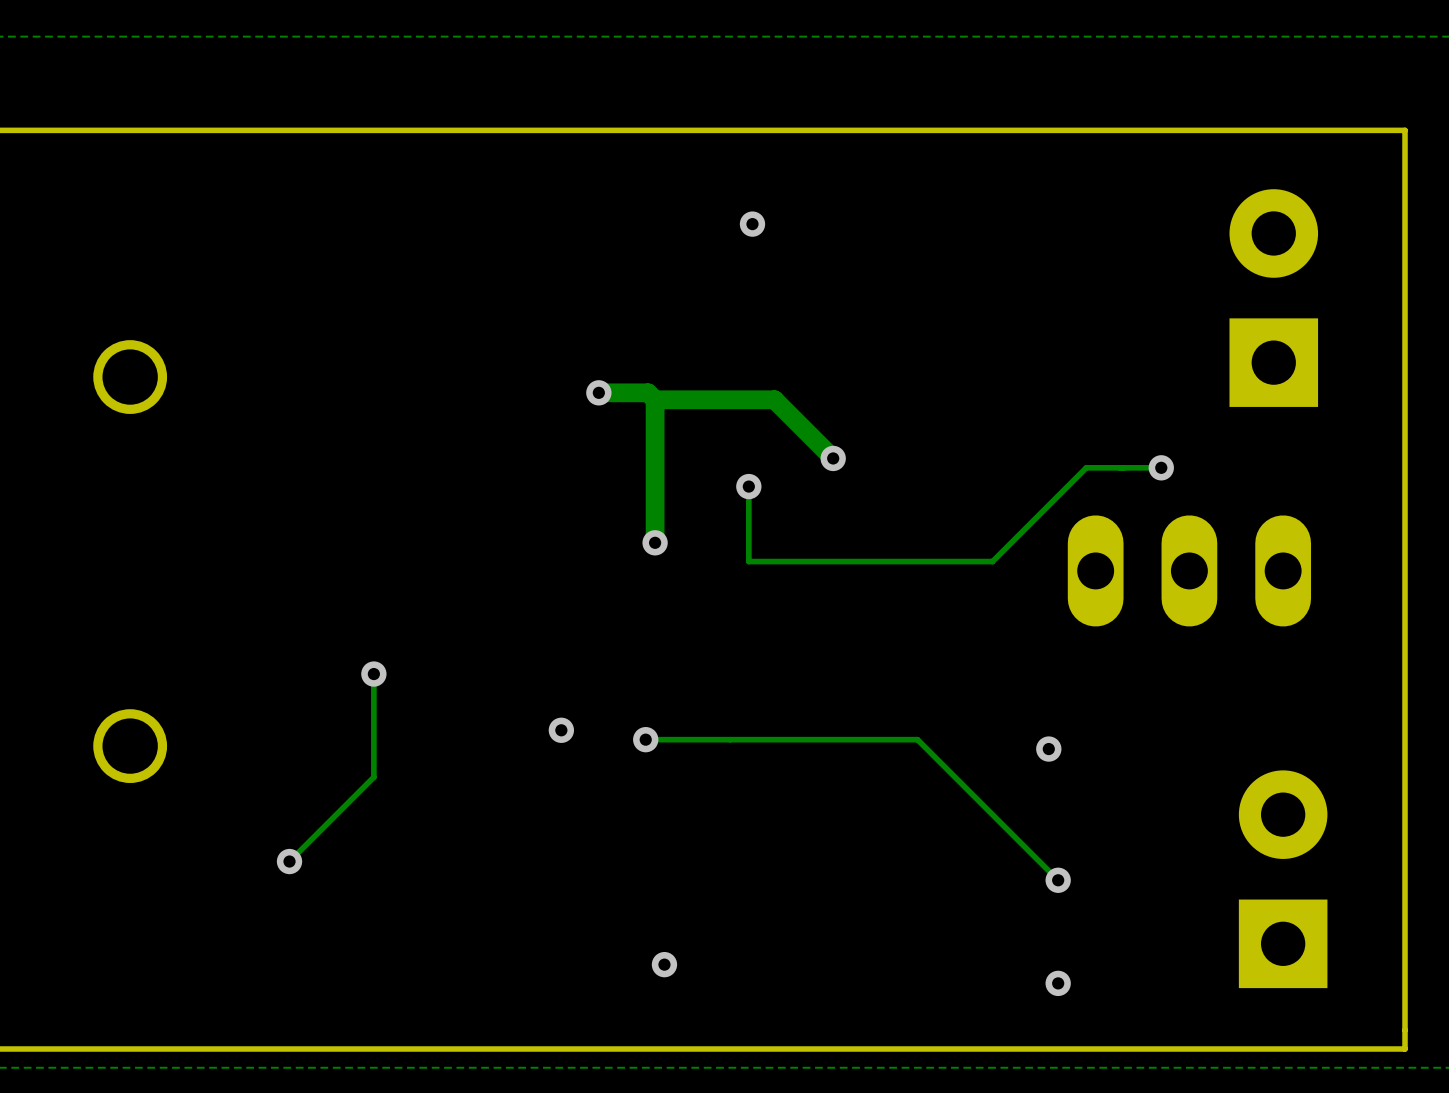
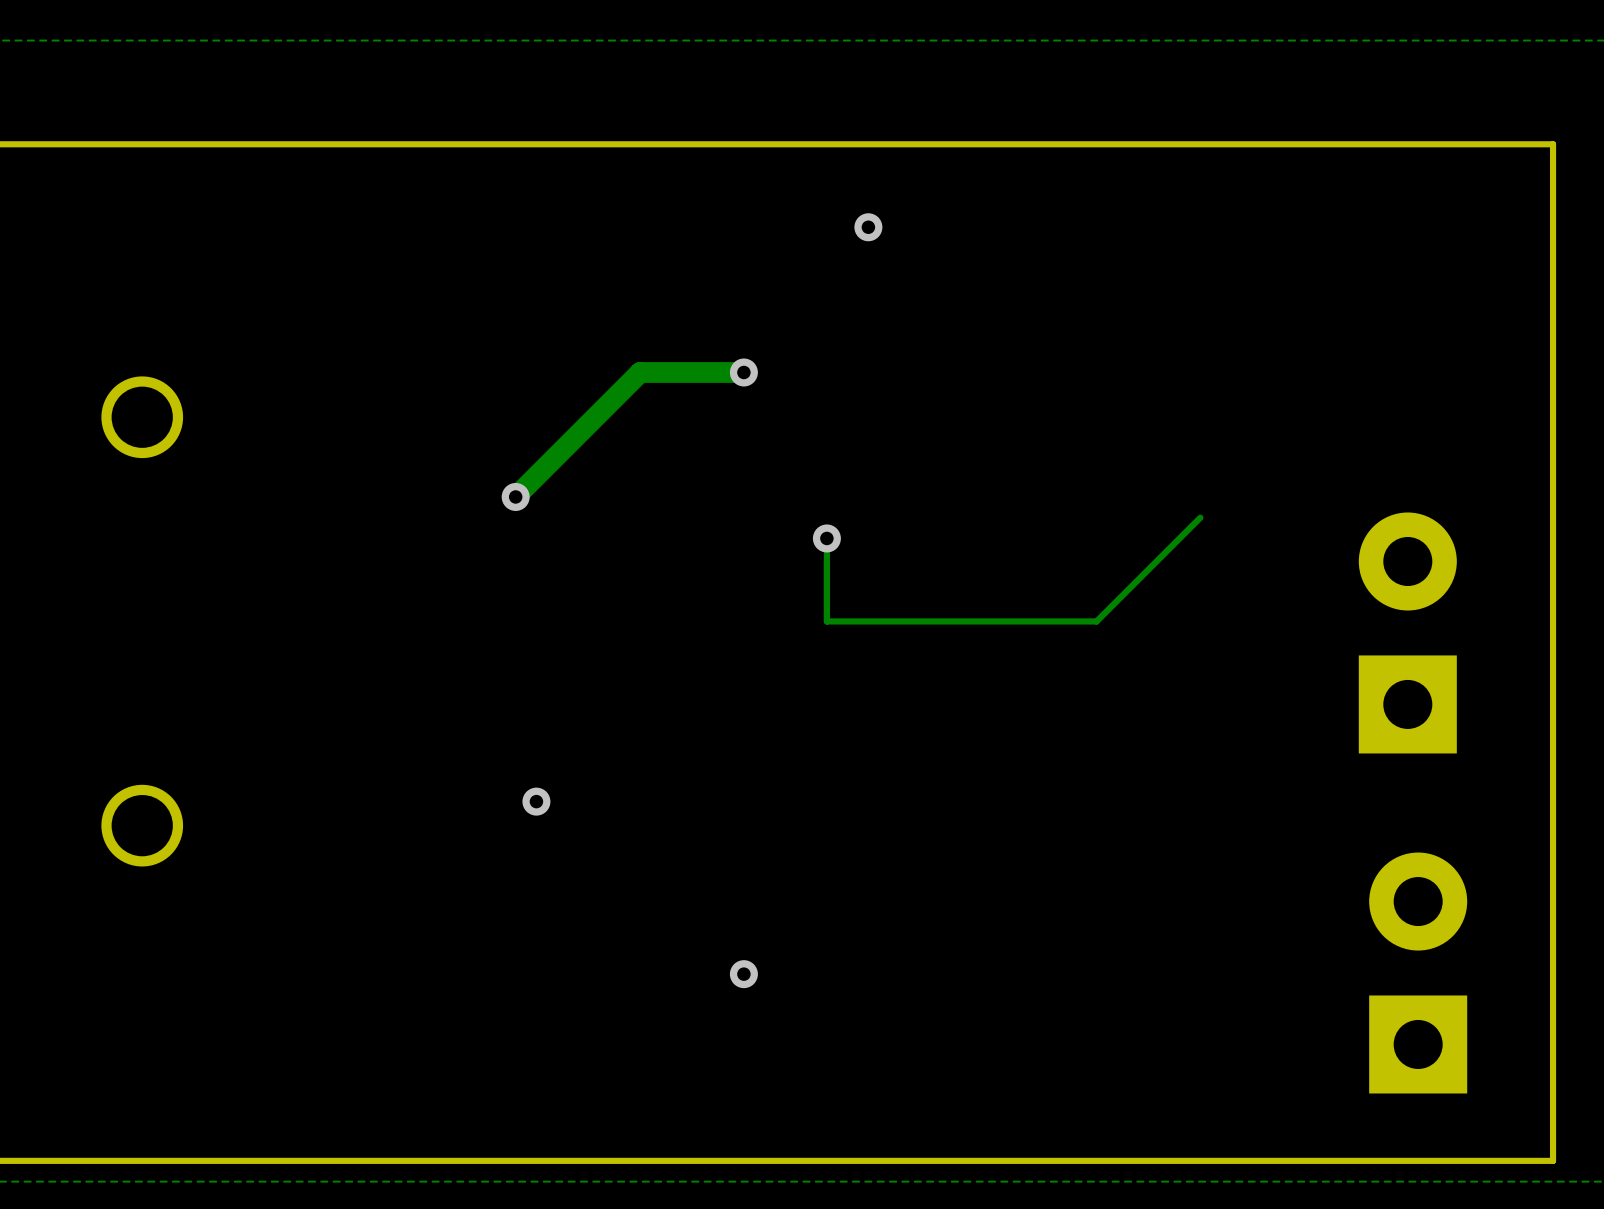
via position: (752, 224) -> (868, 227)
part position: (1273, 298) -> (1407, 632)
track: none -> (743, 372) (640, 372) (515, 496)
via: none -> (743, 372)
track: (598, 392) (648, 392) (655, 399) -> none
via: (598, 392) -> none
track: (655, 399) (774, 399) (833, 458) -> none
track: (655, 399) (655, 542) -> none
via: none -> (515, 496)
via: (833, 458) -> none
track: (1161, 467) (1086, 467) -> none
via: (1161, 467) -> none
via: (655, 542) -> none
part: (1189, 570) -> none
track: (373, 674) (373, 777) (289, 861) -> none
via: (373, 674) -> none
via: none -> (536, 801)
via: (561, 730) -> none
track: (645, 739) (917, 739) (1058, 880) -> none
via: (645, 739) -> none
via: (1048, 749) -> none
via: (289, 861) -> none
via: none -> (743, 974)
via: (1058, 880) -> none
via: (664, 964) -> none
via: (1058, 983) -> none

